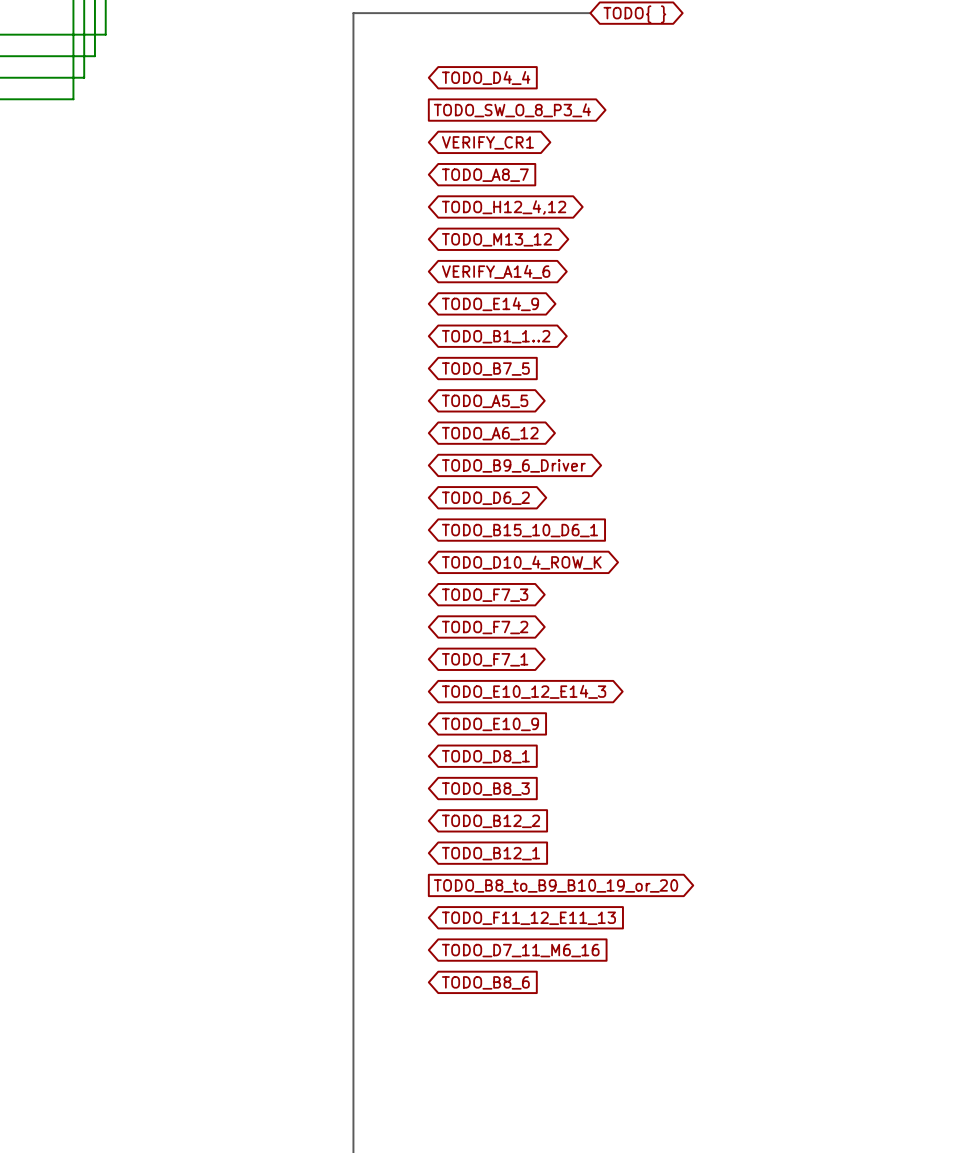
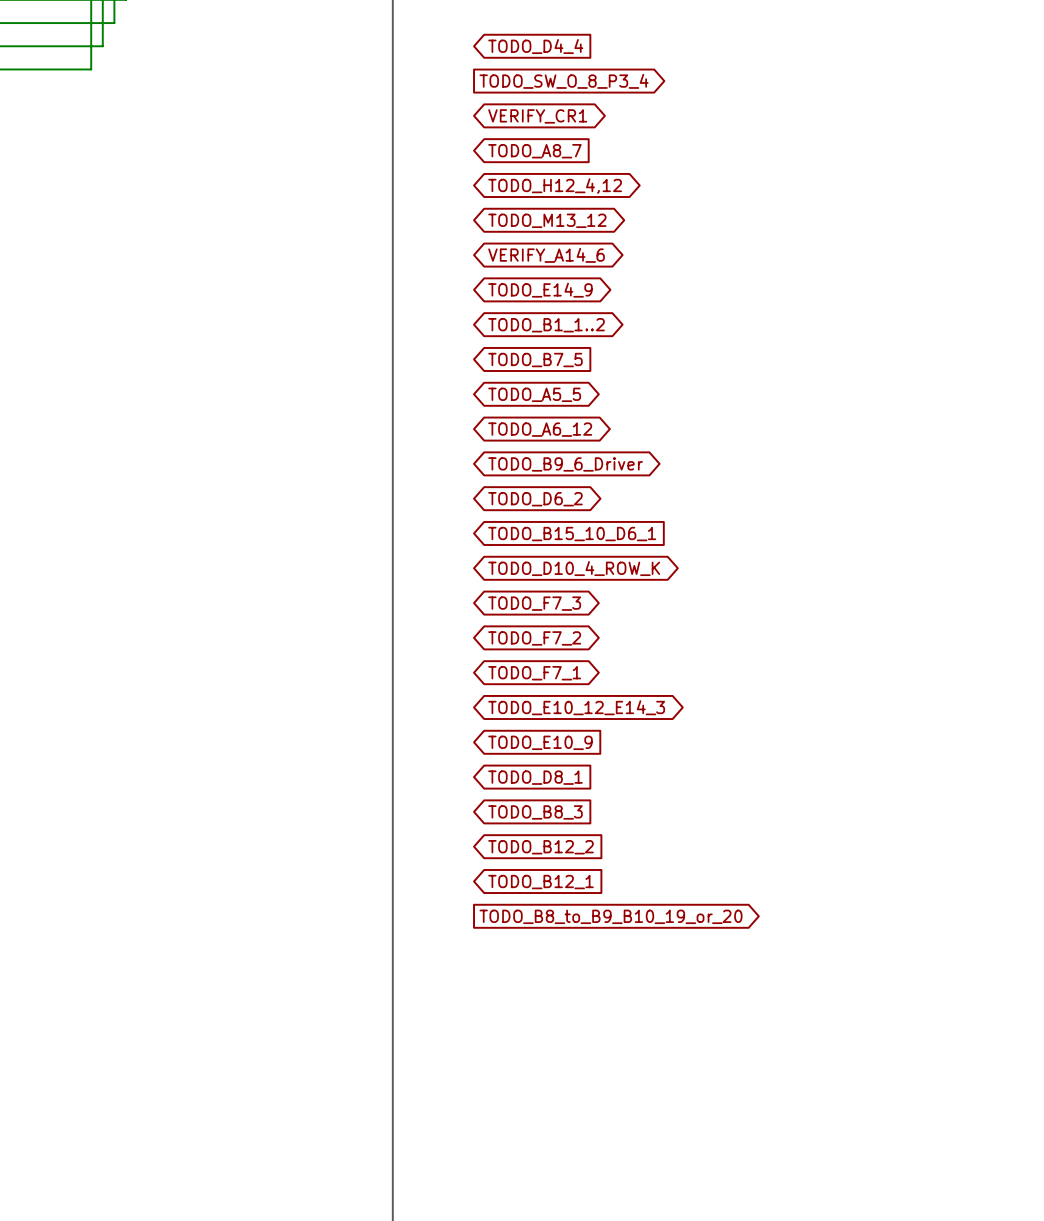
global label: TODO_F11_12_E11_13 (528, 918) -> none
global label: TODO_D7_11_M6_16 (520, 950) -> none
global label: TODO_B8_6 (485, 982) -> none

